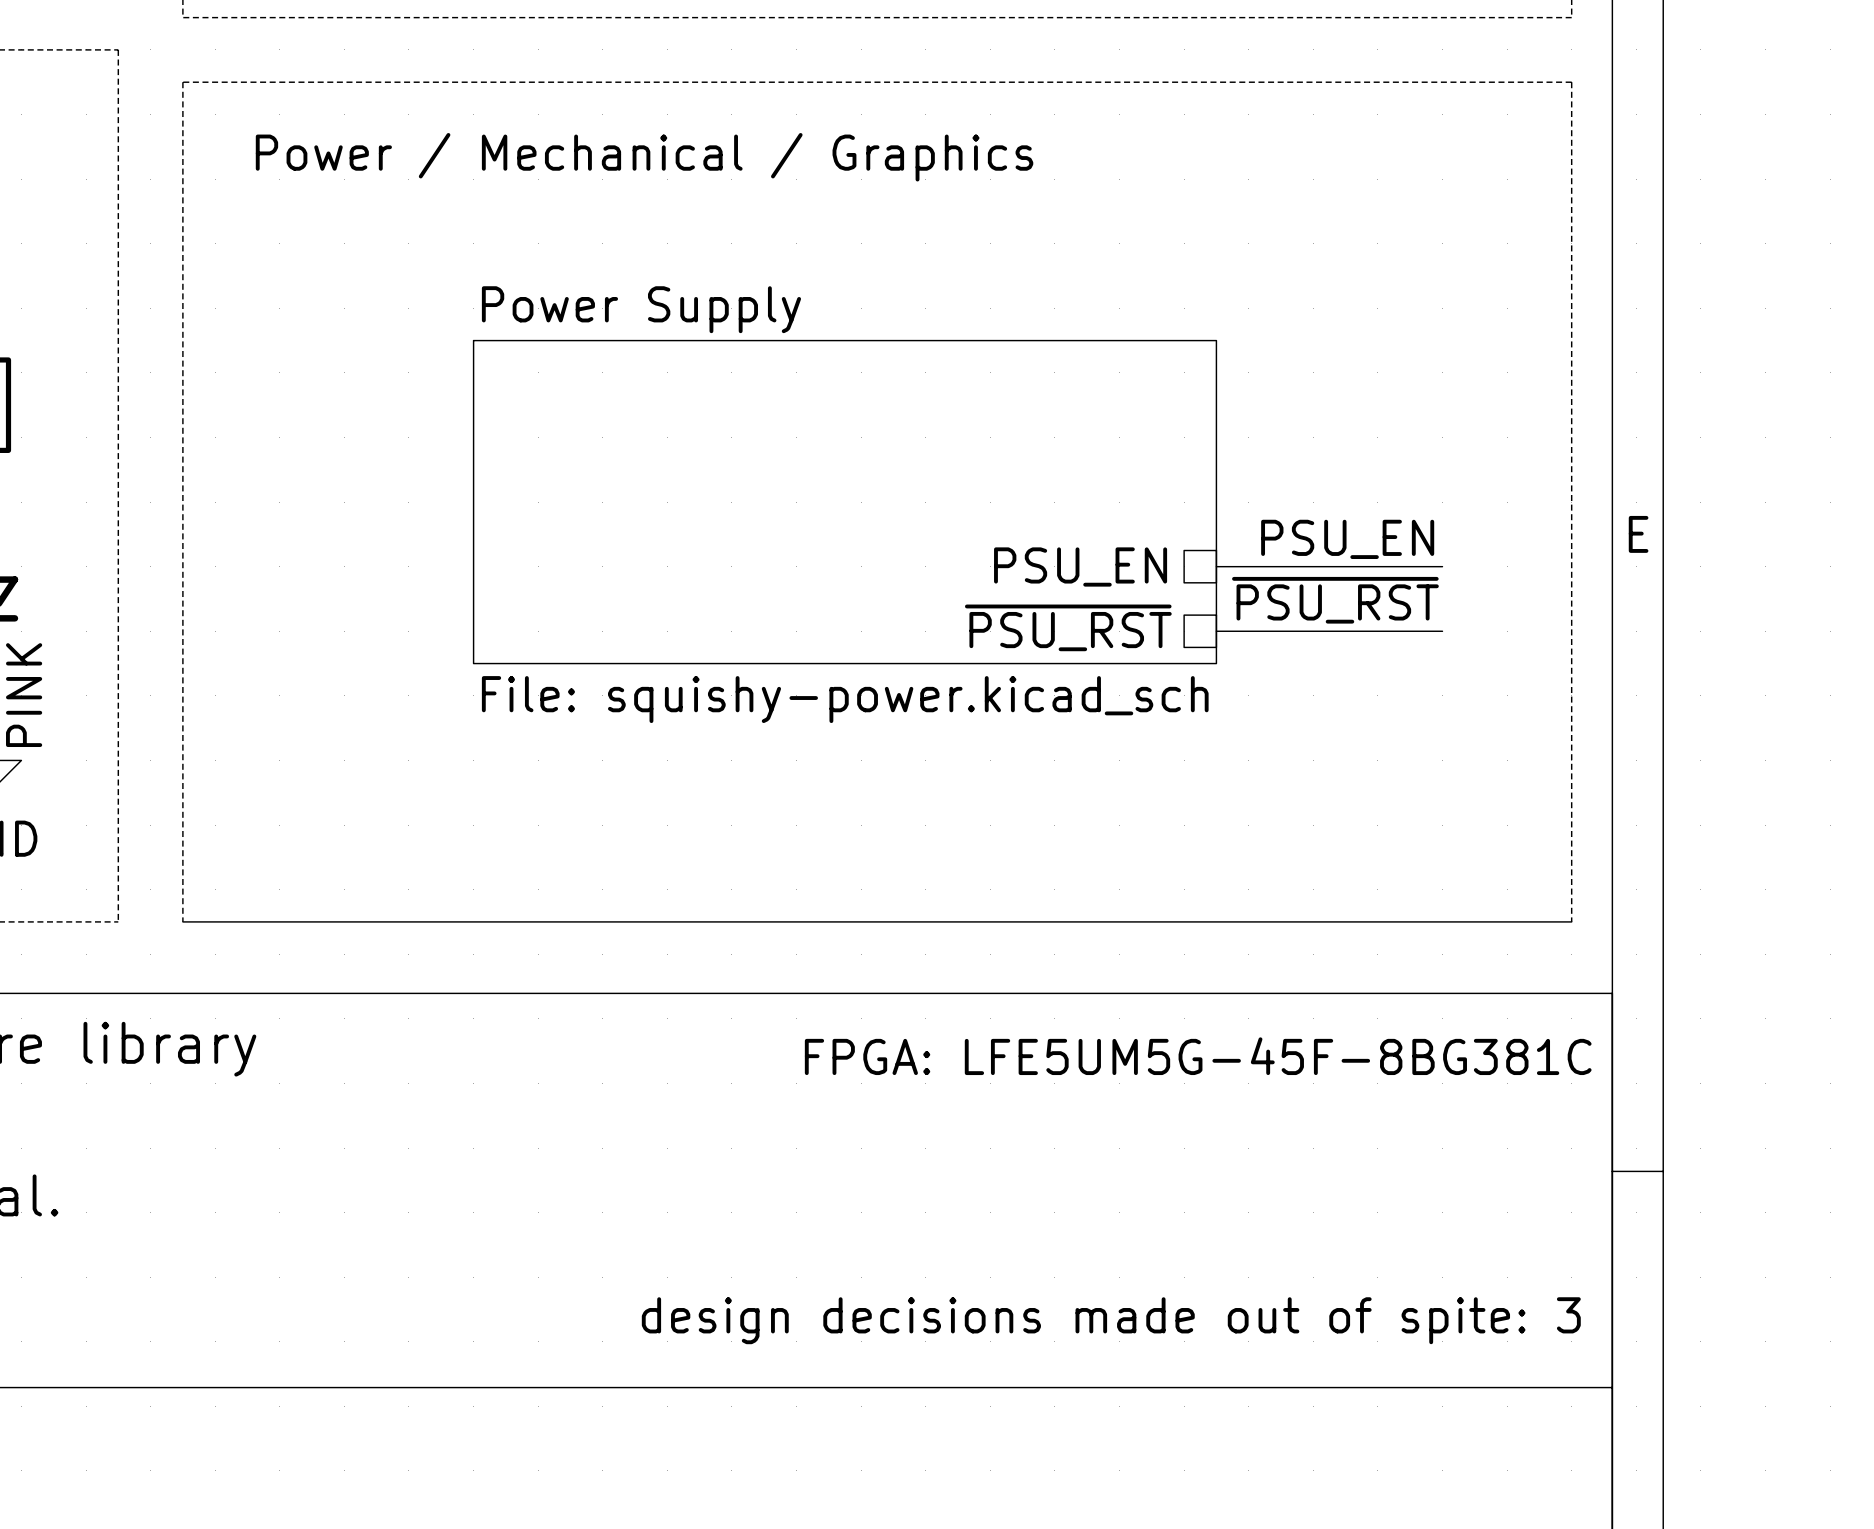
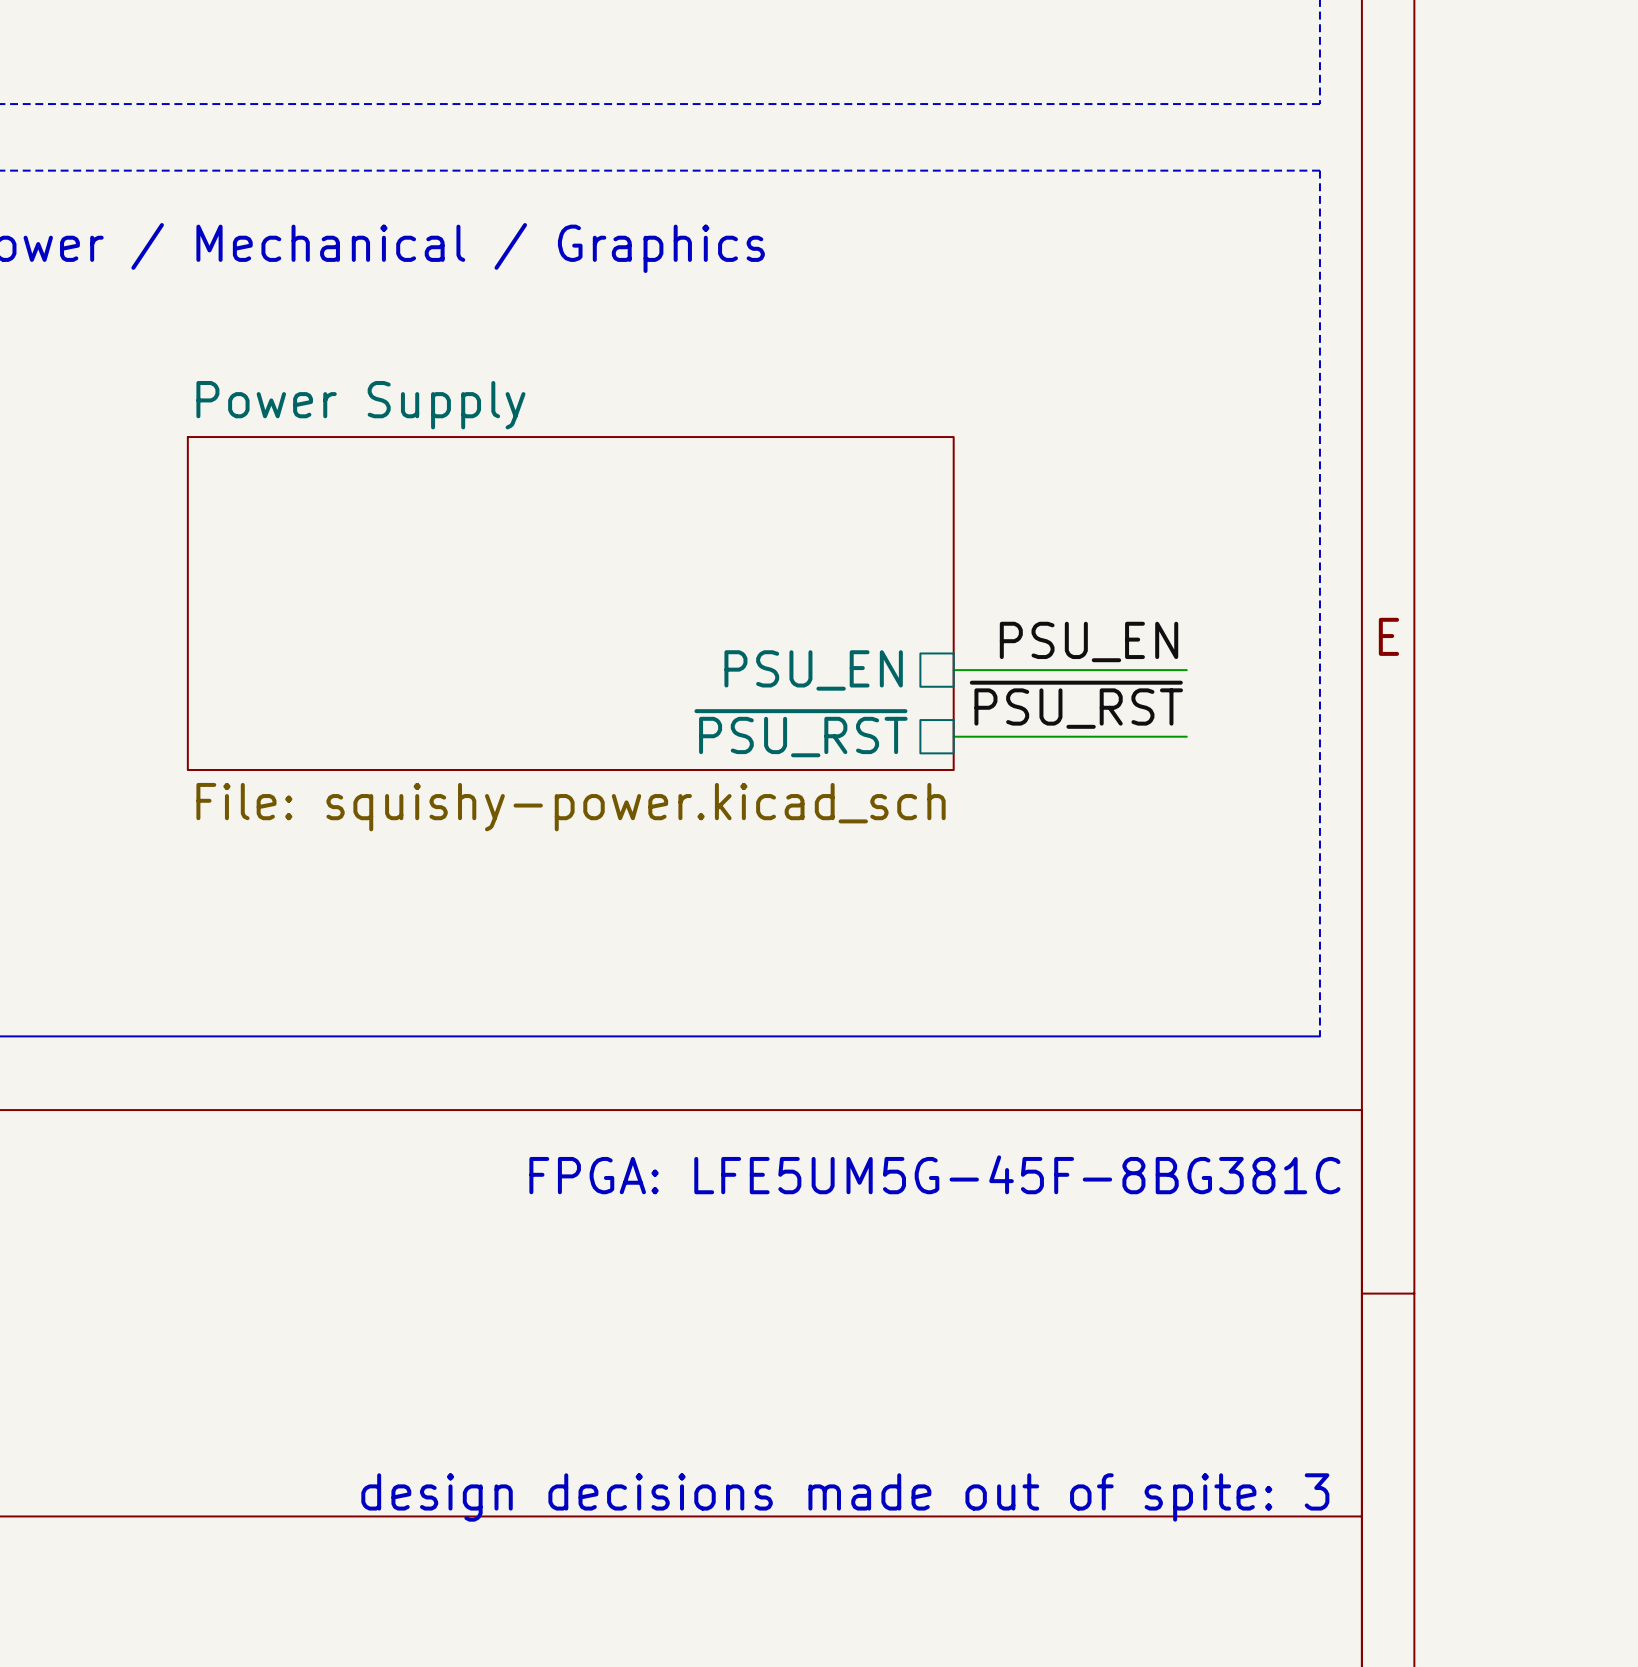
text position: design decisions made out of spite: 3 (1111, 1320) -> design decisions made out of spite: 3 (845, 1497)

